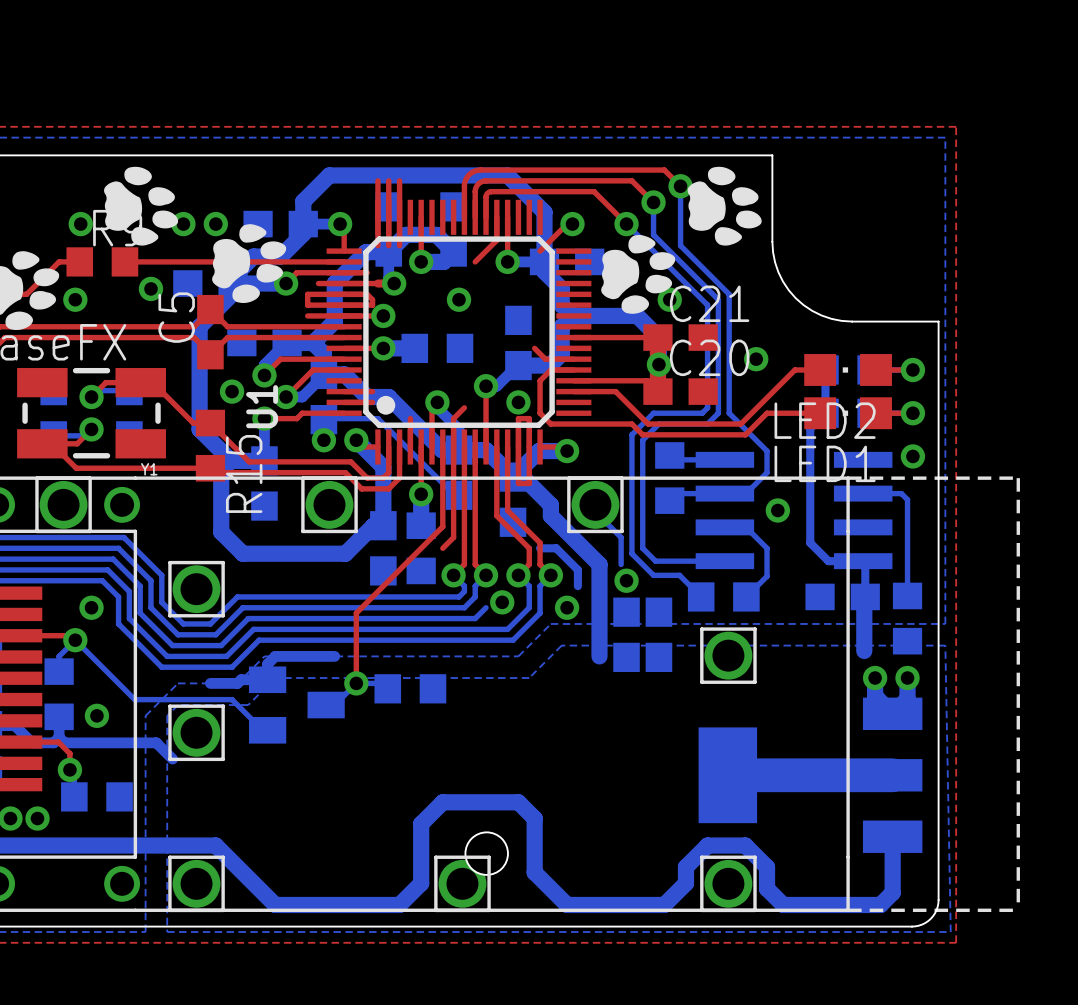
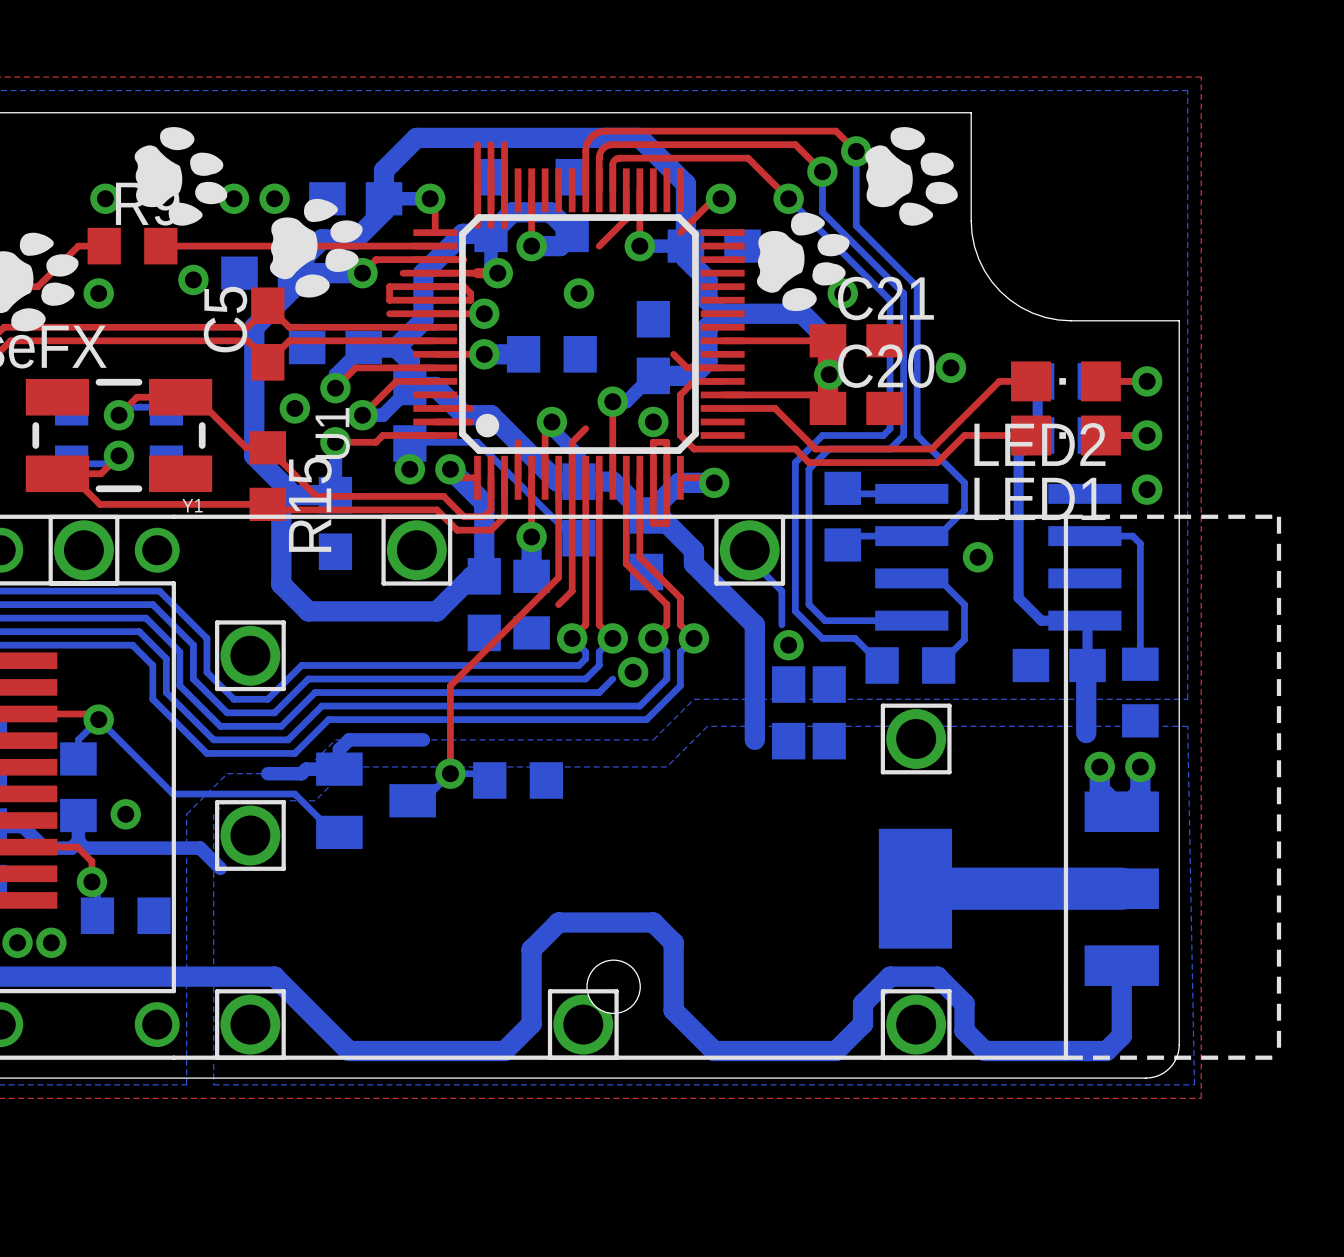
bottom track: (540, 548) (556, 548) (577, 569) (577, 586) -> none
via: (91, 607) -> none
via: (567, 607) -> none

